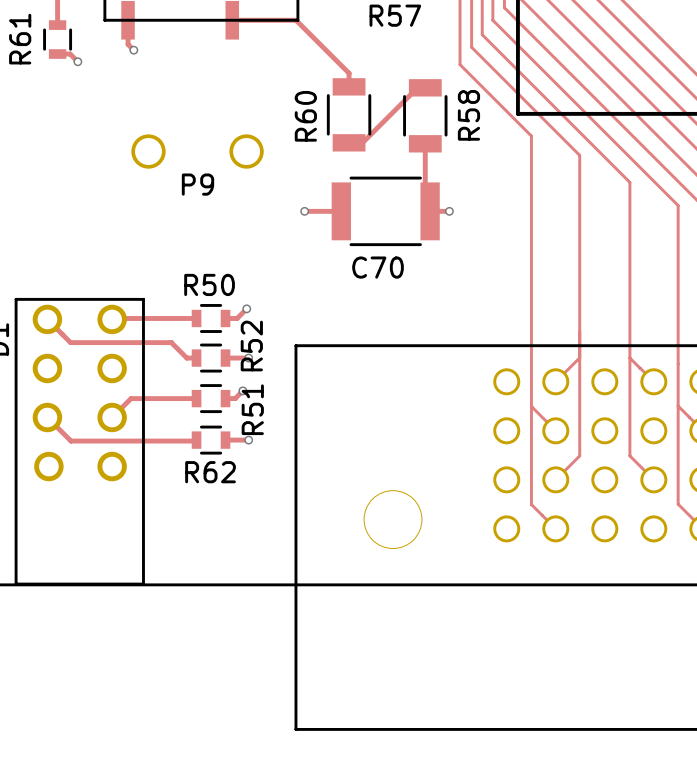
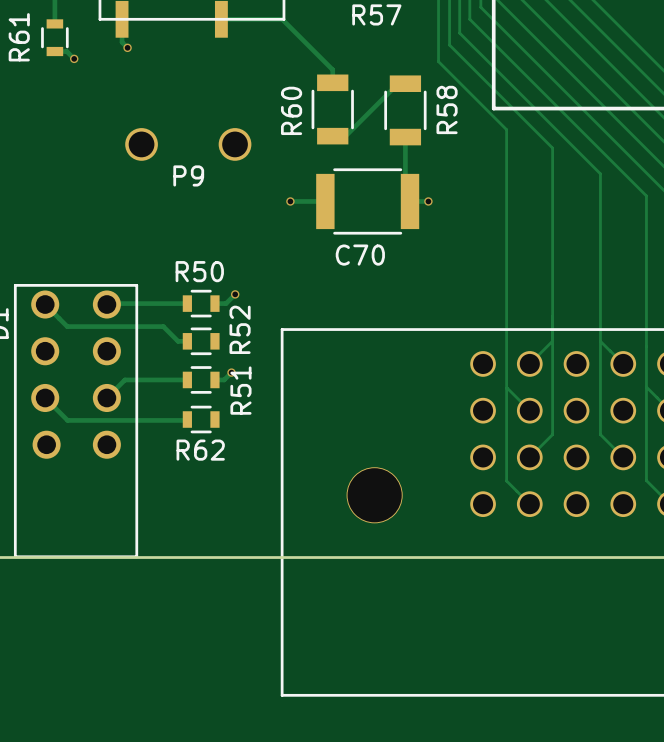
track: (225, 358) (248, 358) -> none
via: (248, 358) -> none
track: (225, 440) (248, 440) -> none
via: (248, 440) -> none

